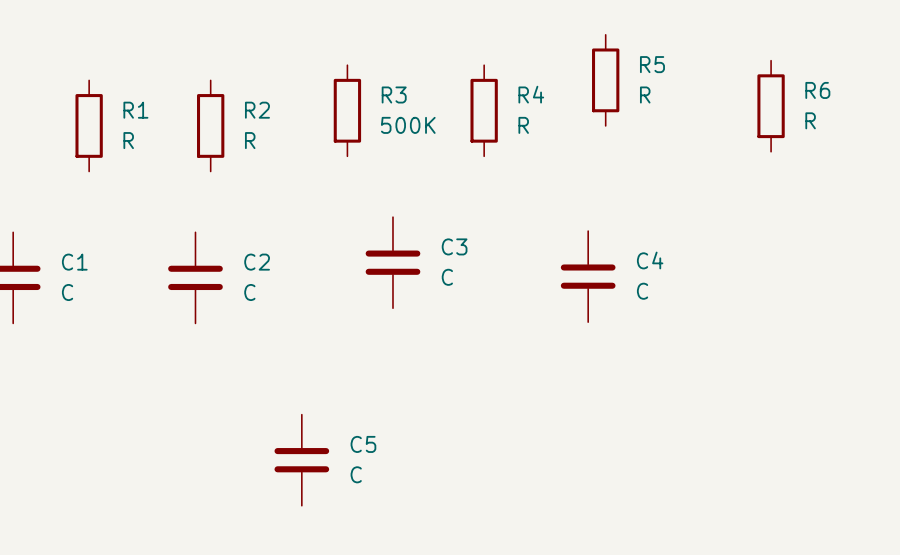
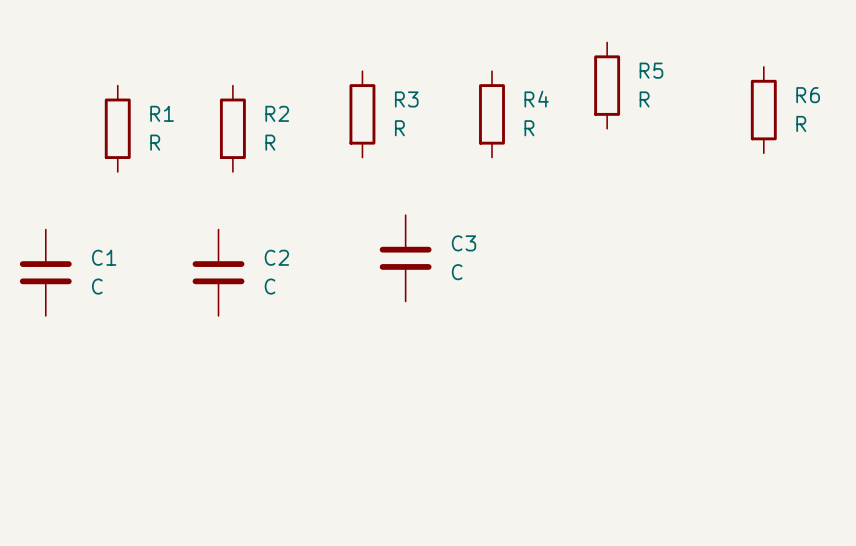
R3 value: 500K (408, 125) -> R (399, 128)
C4: C (588, 276) -> none
C5: C (301, 460) -> none

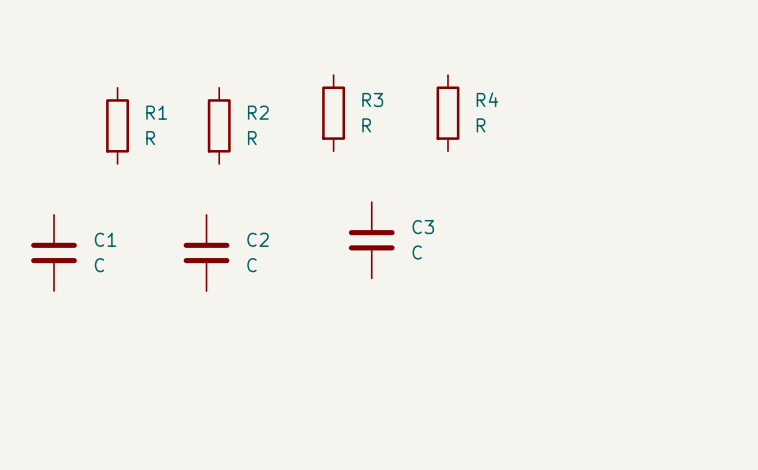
R5: R (607, 85) -> none
R6: R (763, 110) -> none

